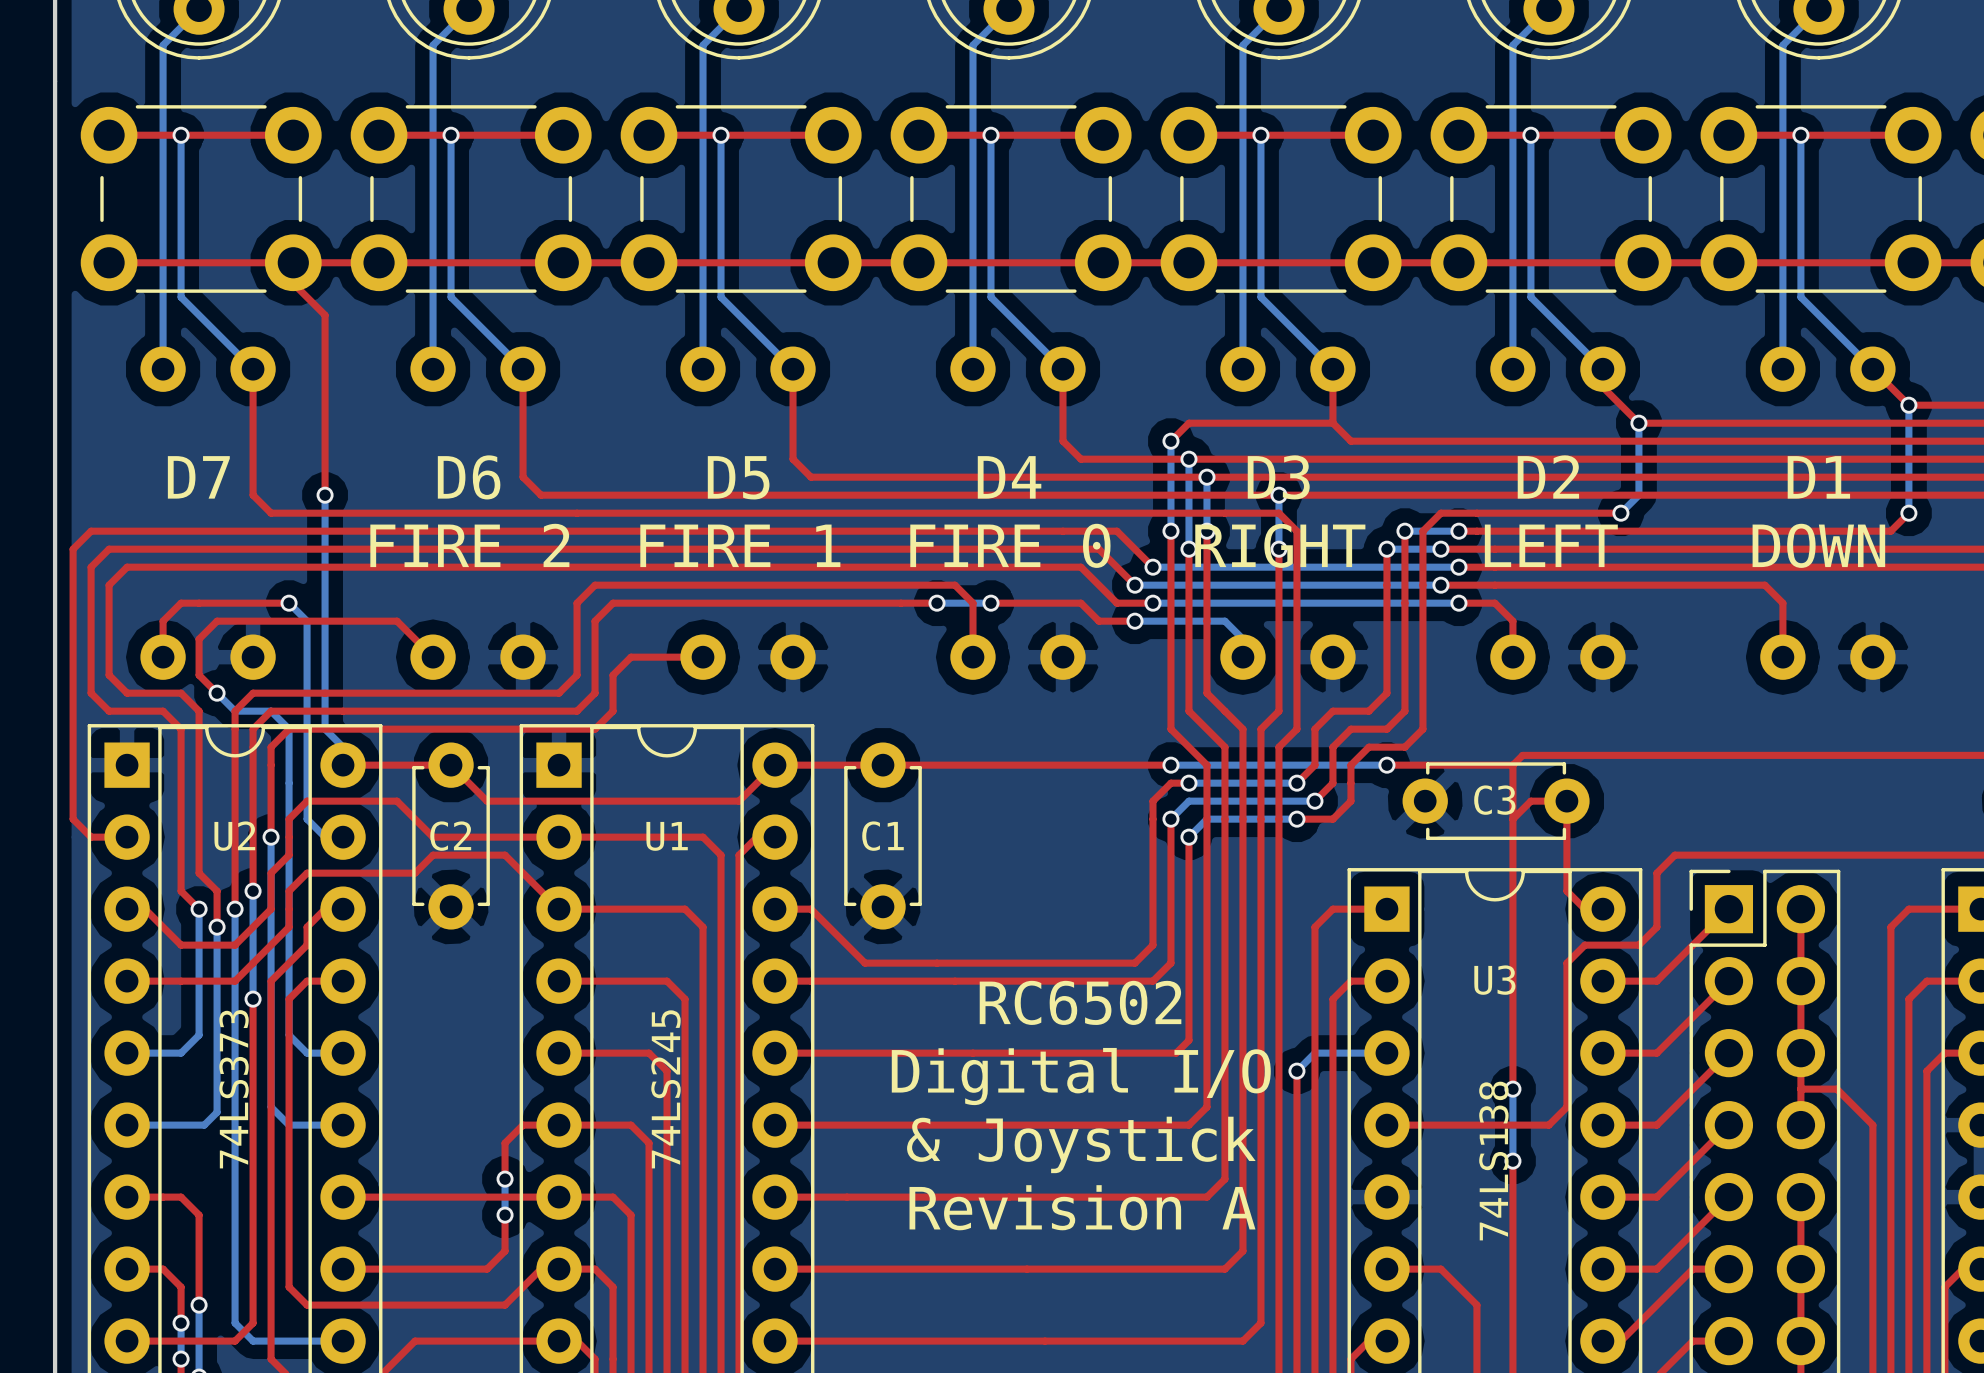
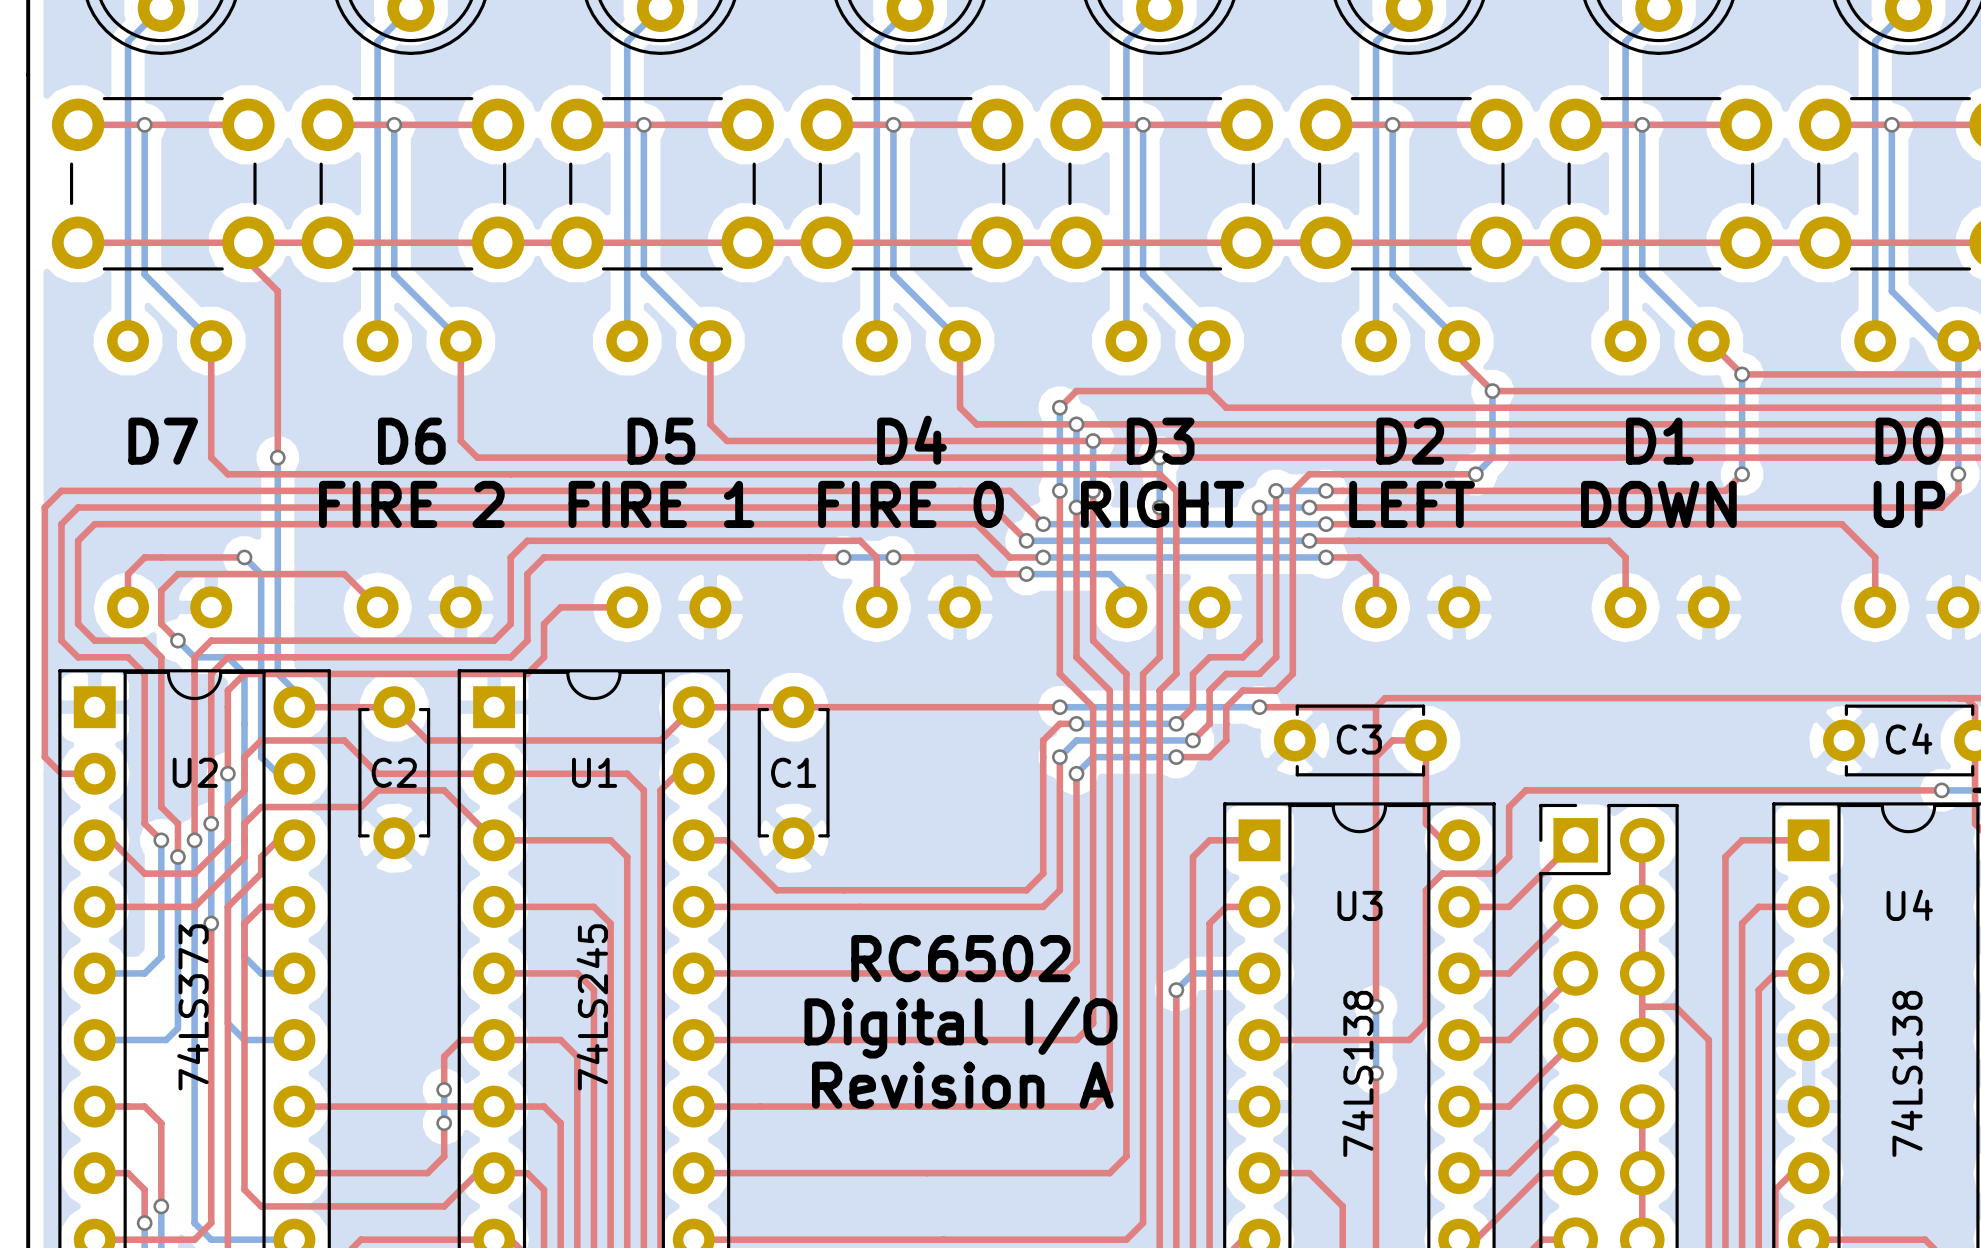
text position: RC6502 (1080, 1002) -> RC6502 (960, 958)
text position: Digital I/O (1081, 1076) -> Digital I/O (960, 1027)
text: & Joystick (1081, 1144) -> none
text position: Revision A (1082, 1207) -> Revision A (962, 1085)

